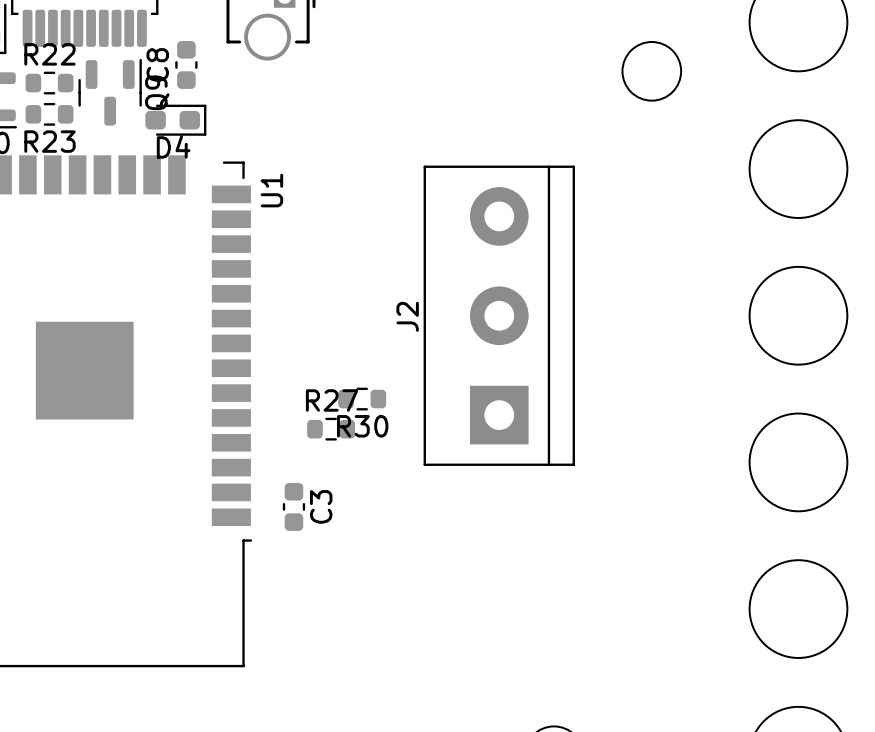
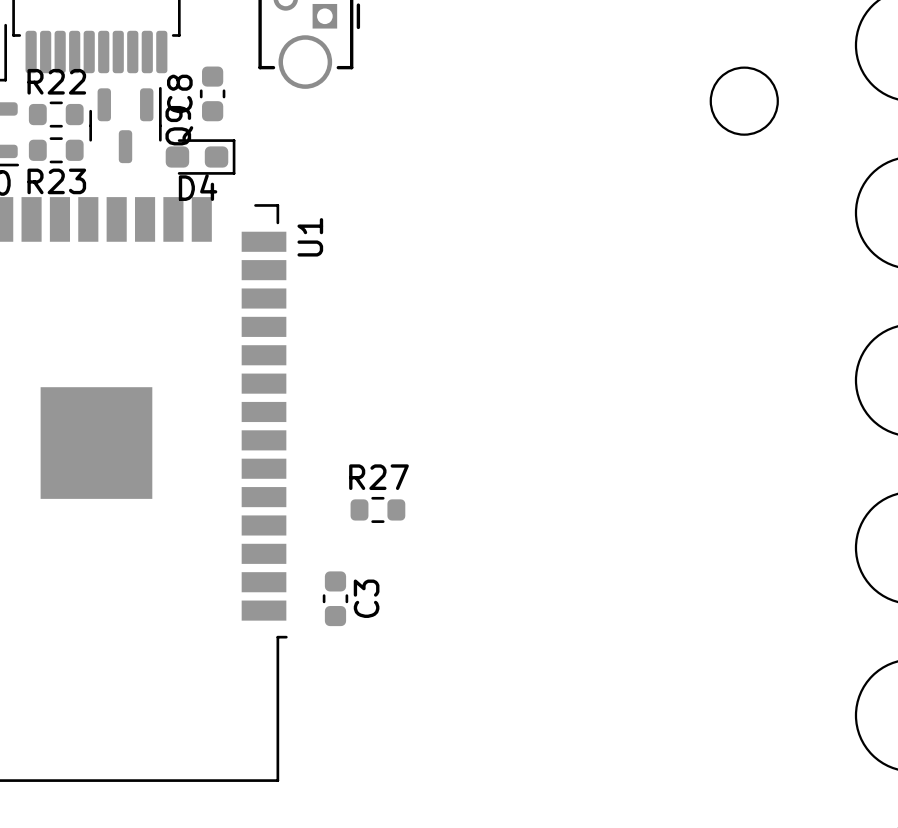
J2: (499, 315) -> none
R30: (362, 399) -> none

